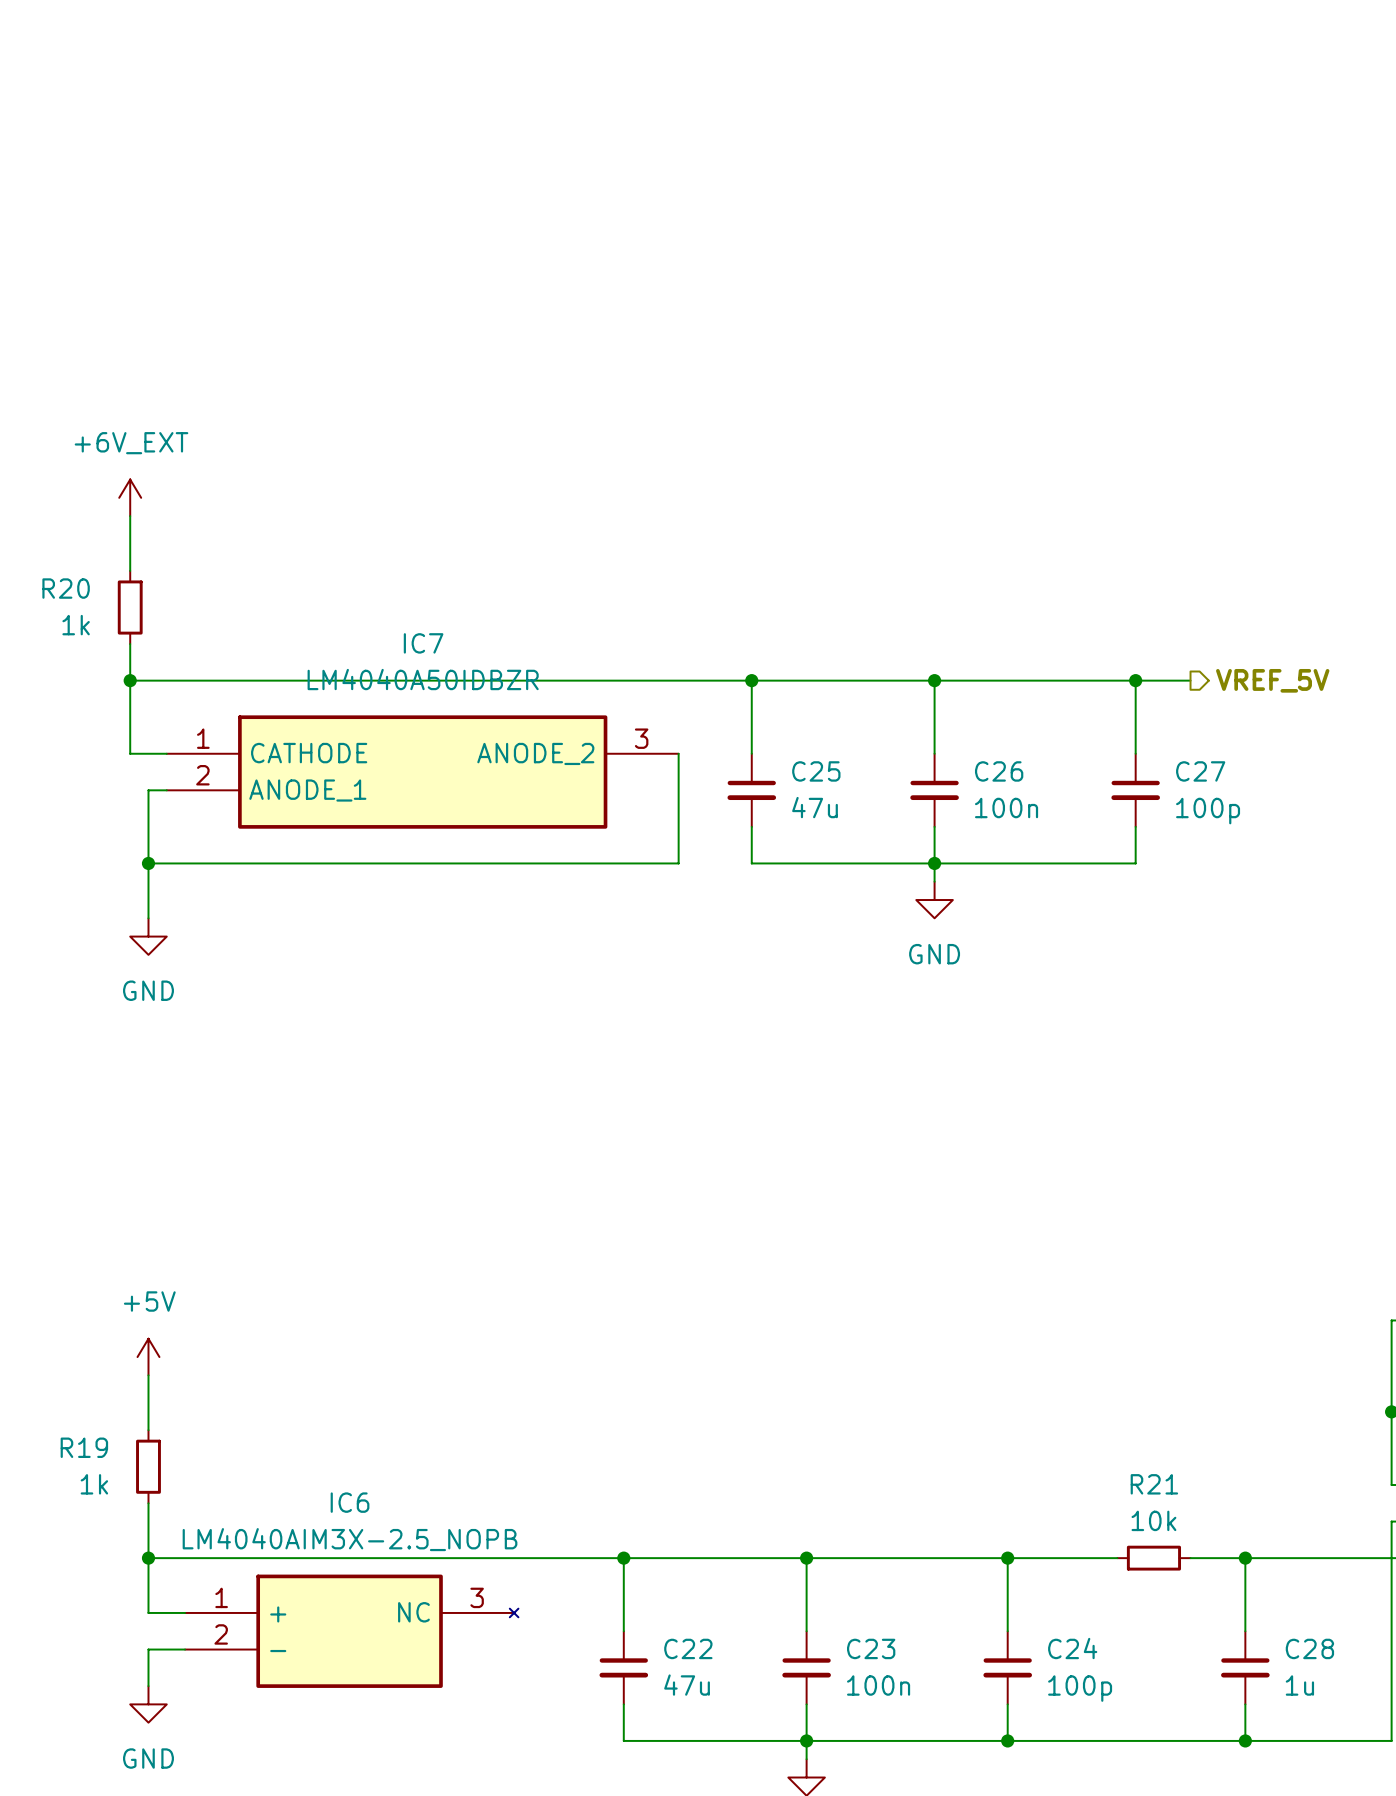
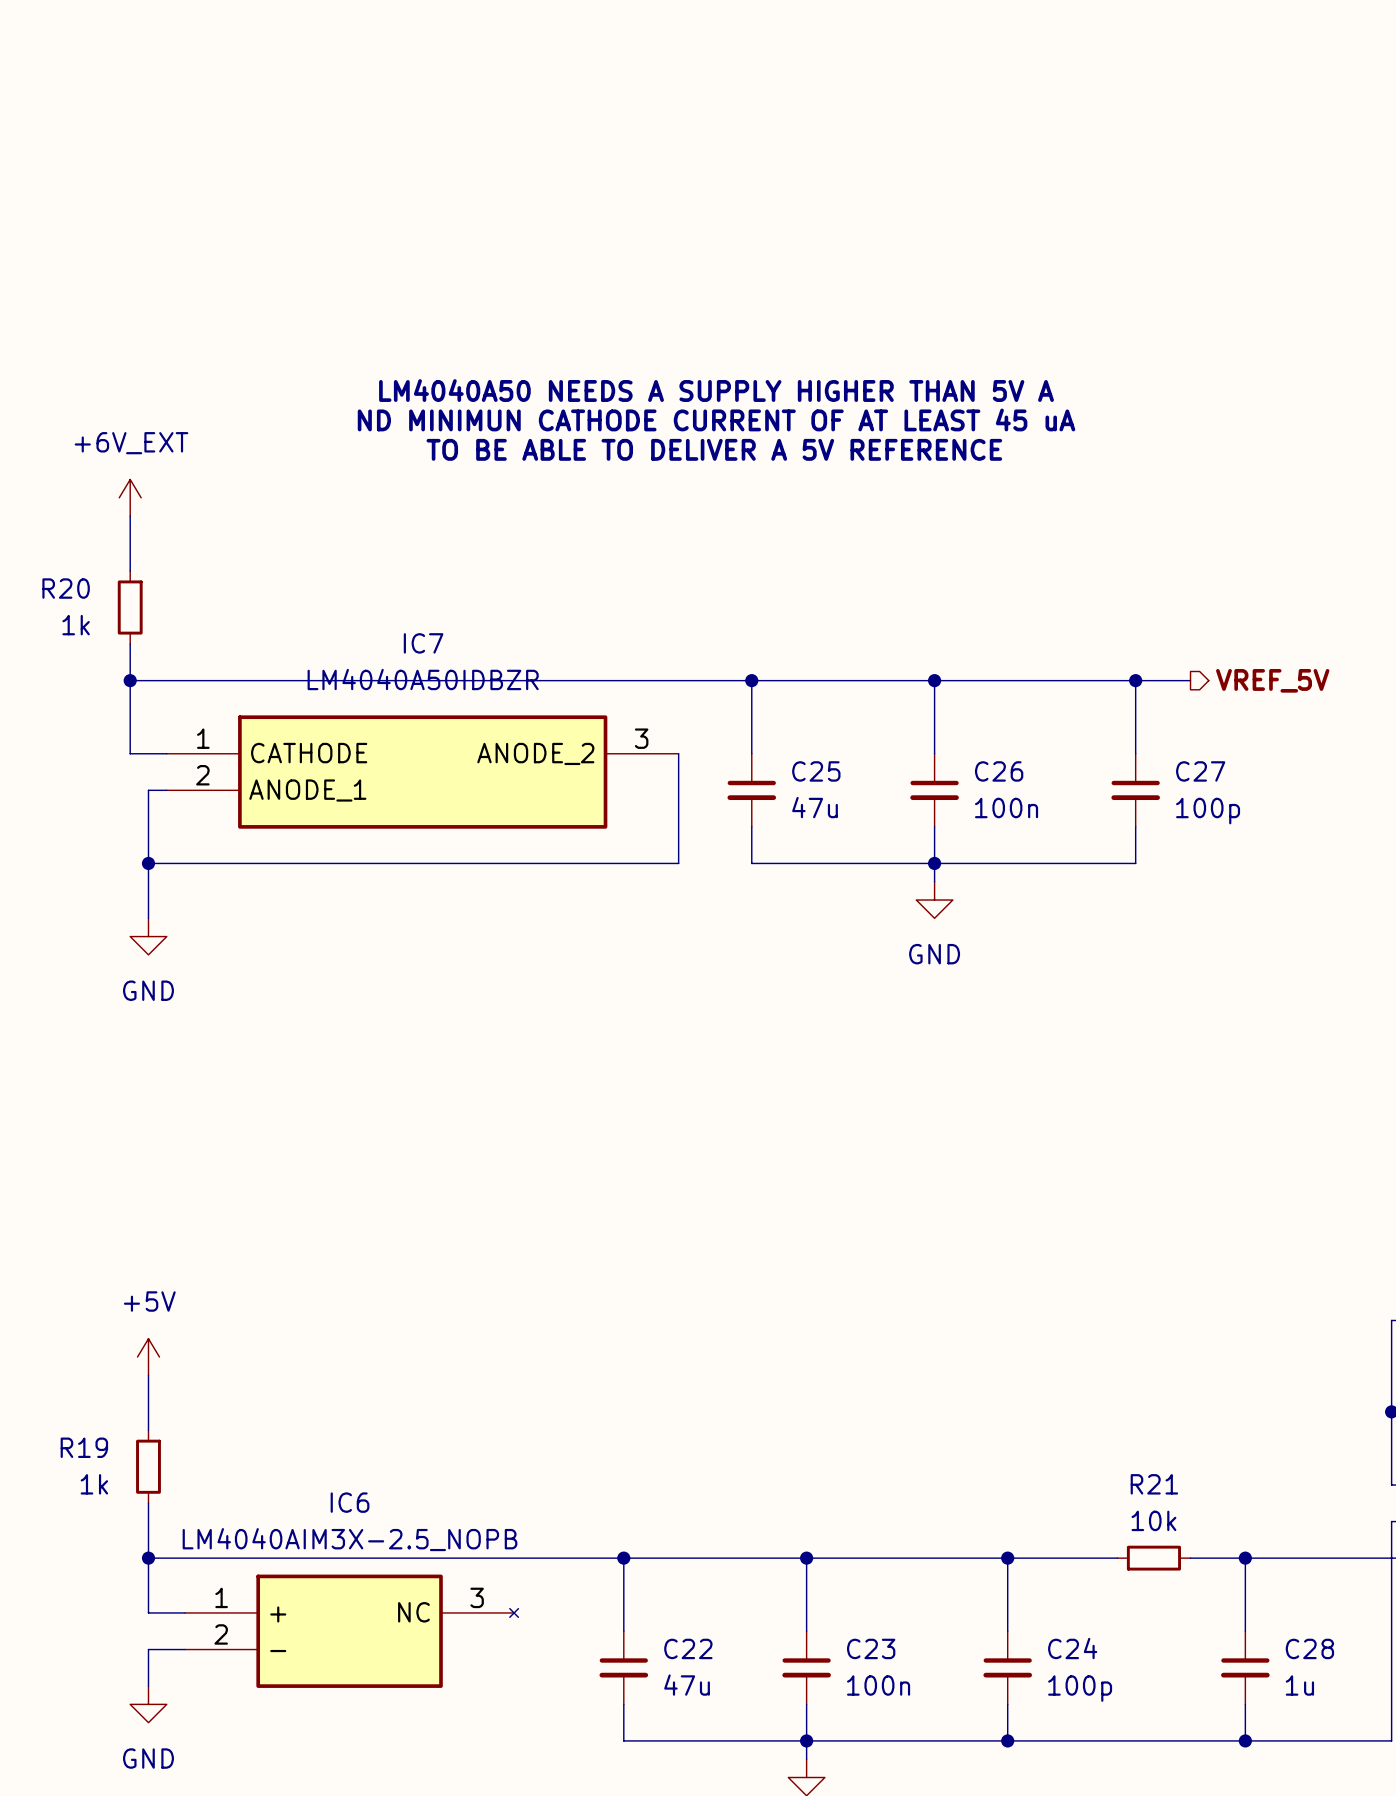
text: none -> LM4040A50 NEEDS A SUPPLY HIGHER THAN 5V A (716, 390)
text: none -> ND MINIMUN CATHODE CURRENT OF AT LEAST 45 uA (716, 419)
text: none -> TO BE ABLE TO DELIVER A 5V REFERENCE (714, 449)

